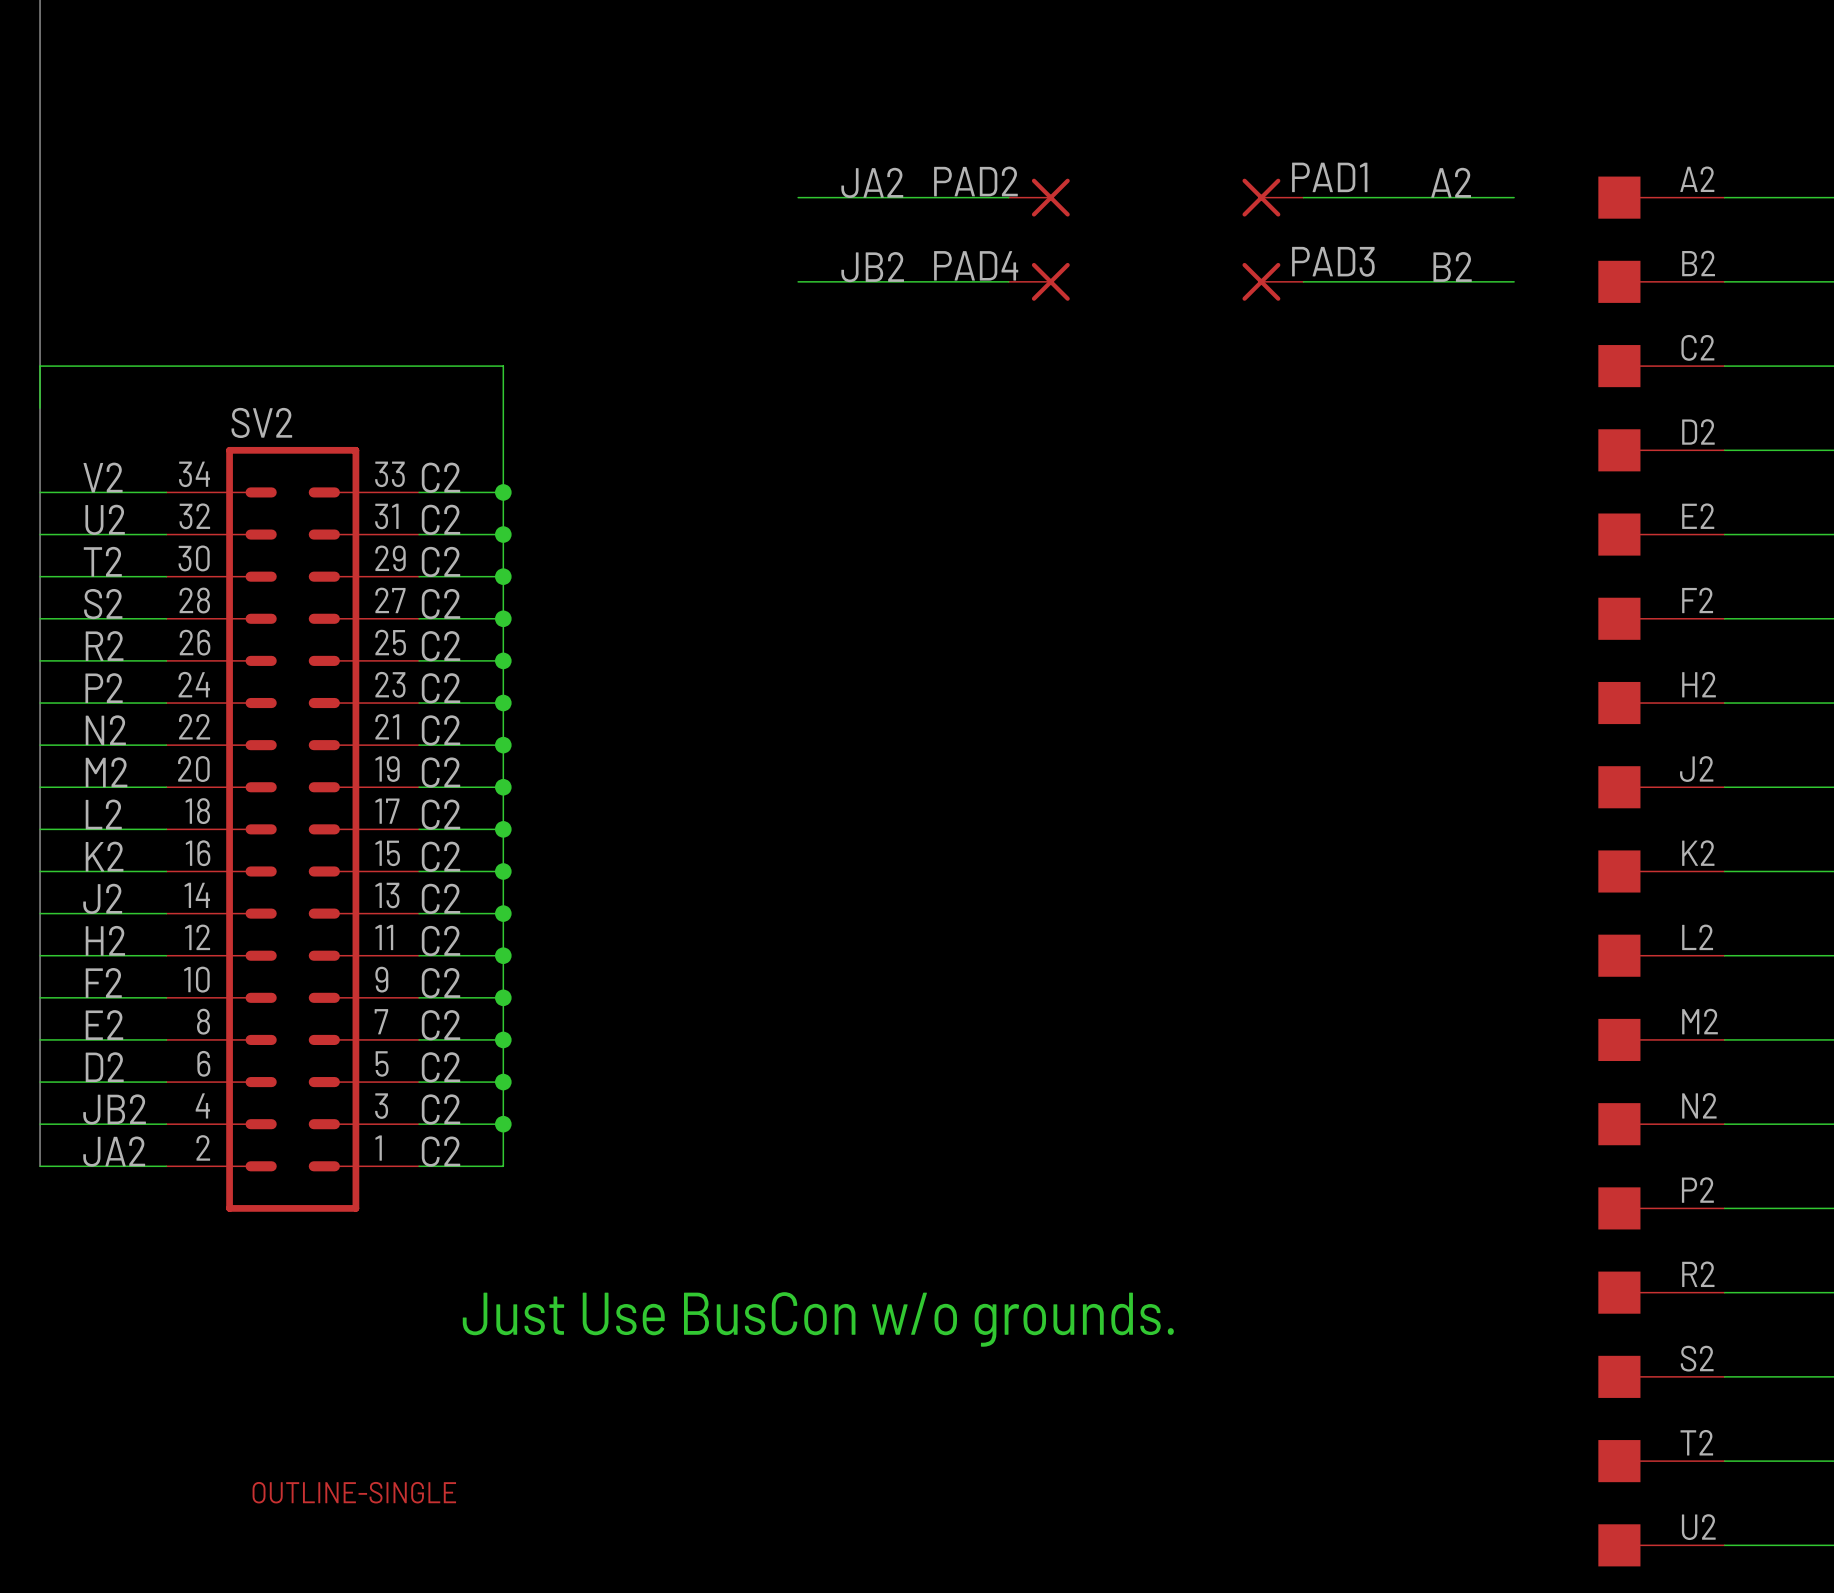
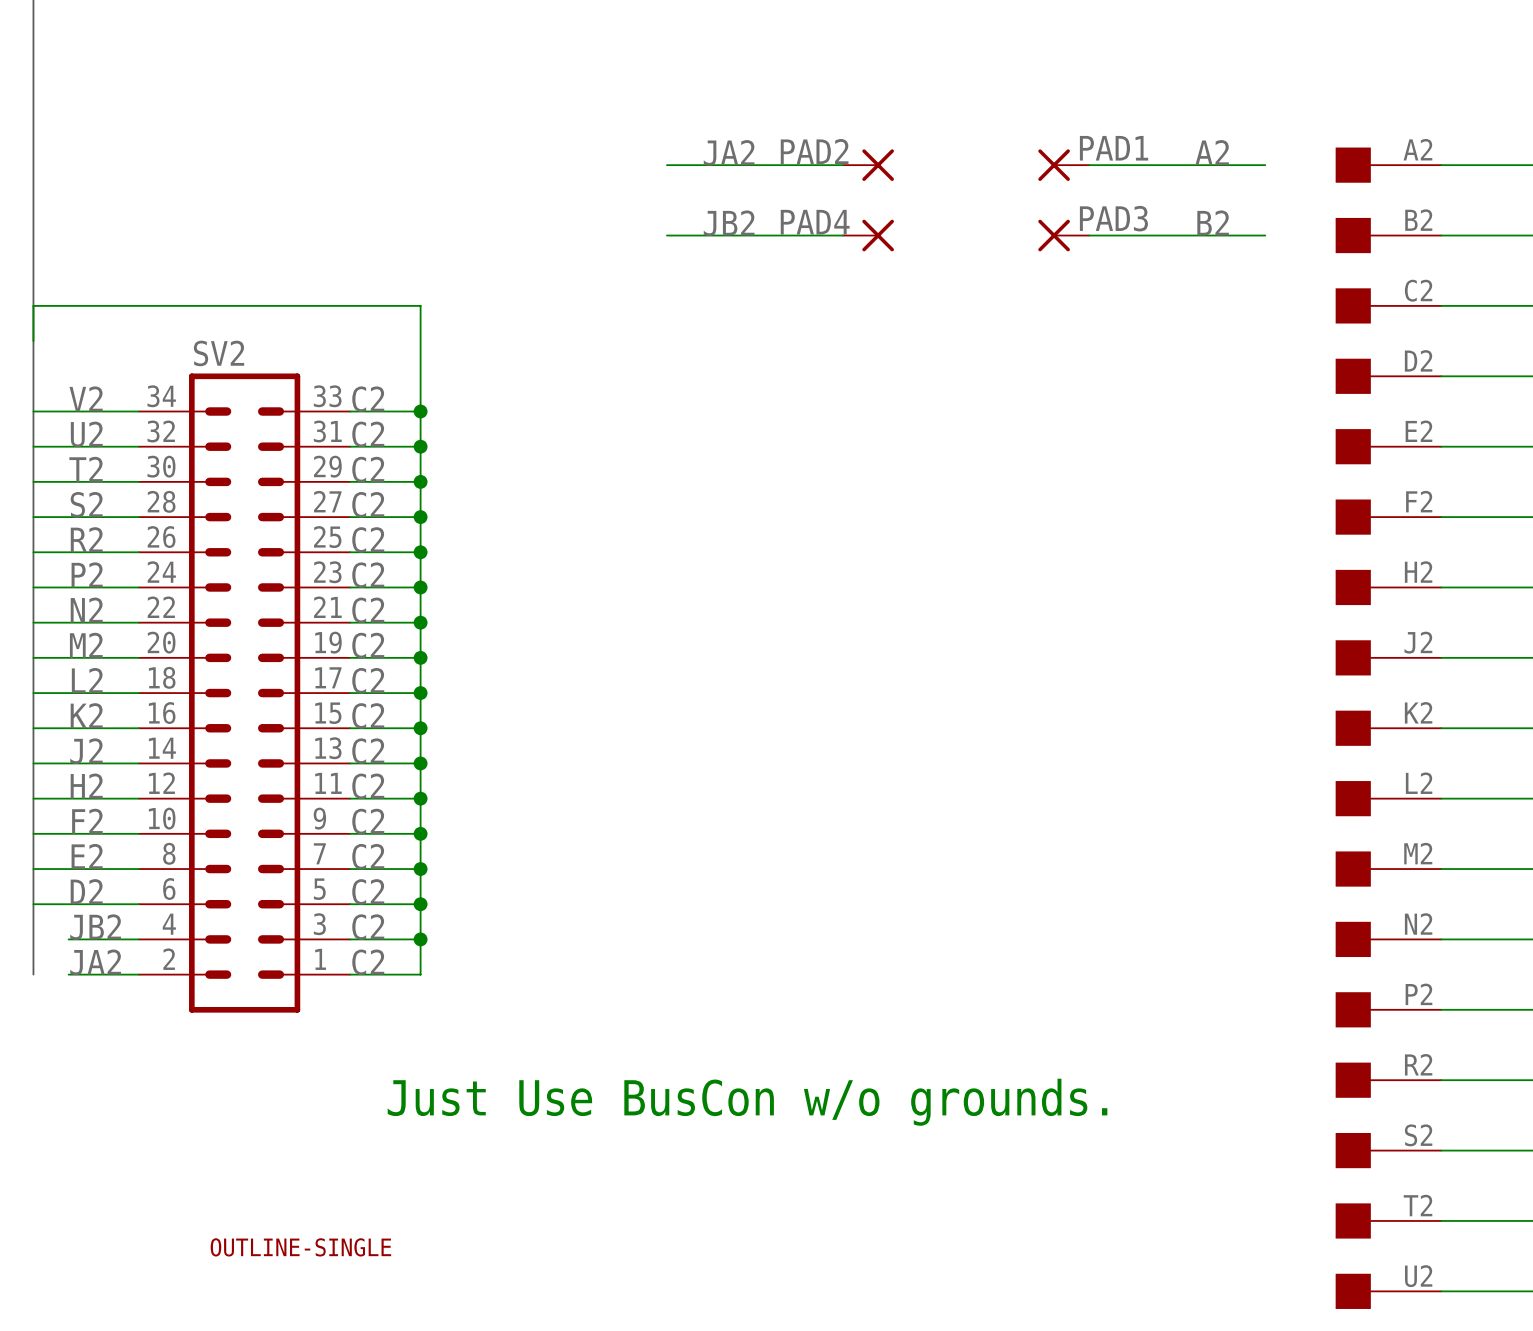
wire: (40, 1124) (82, 1124) -> none
wire: (40, 1166) (82, 1166) -> none

